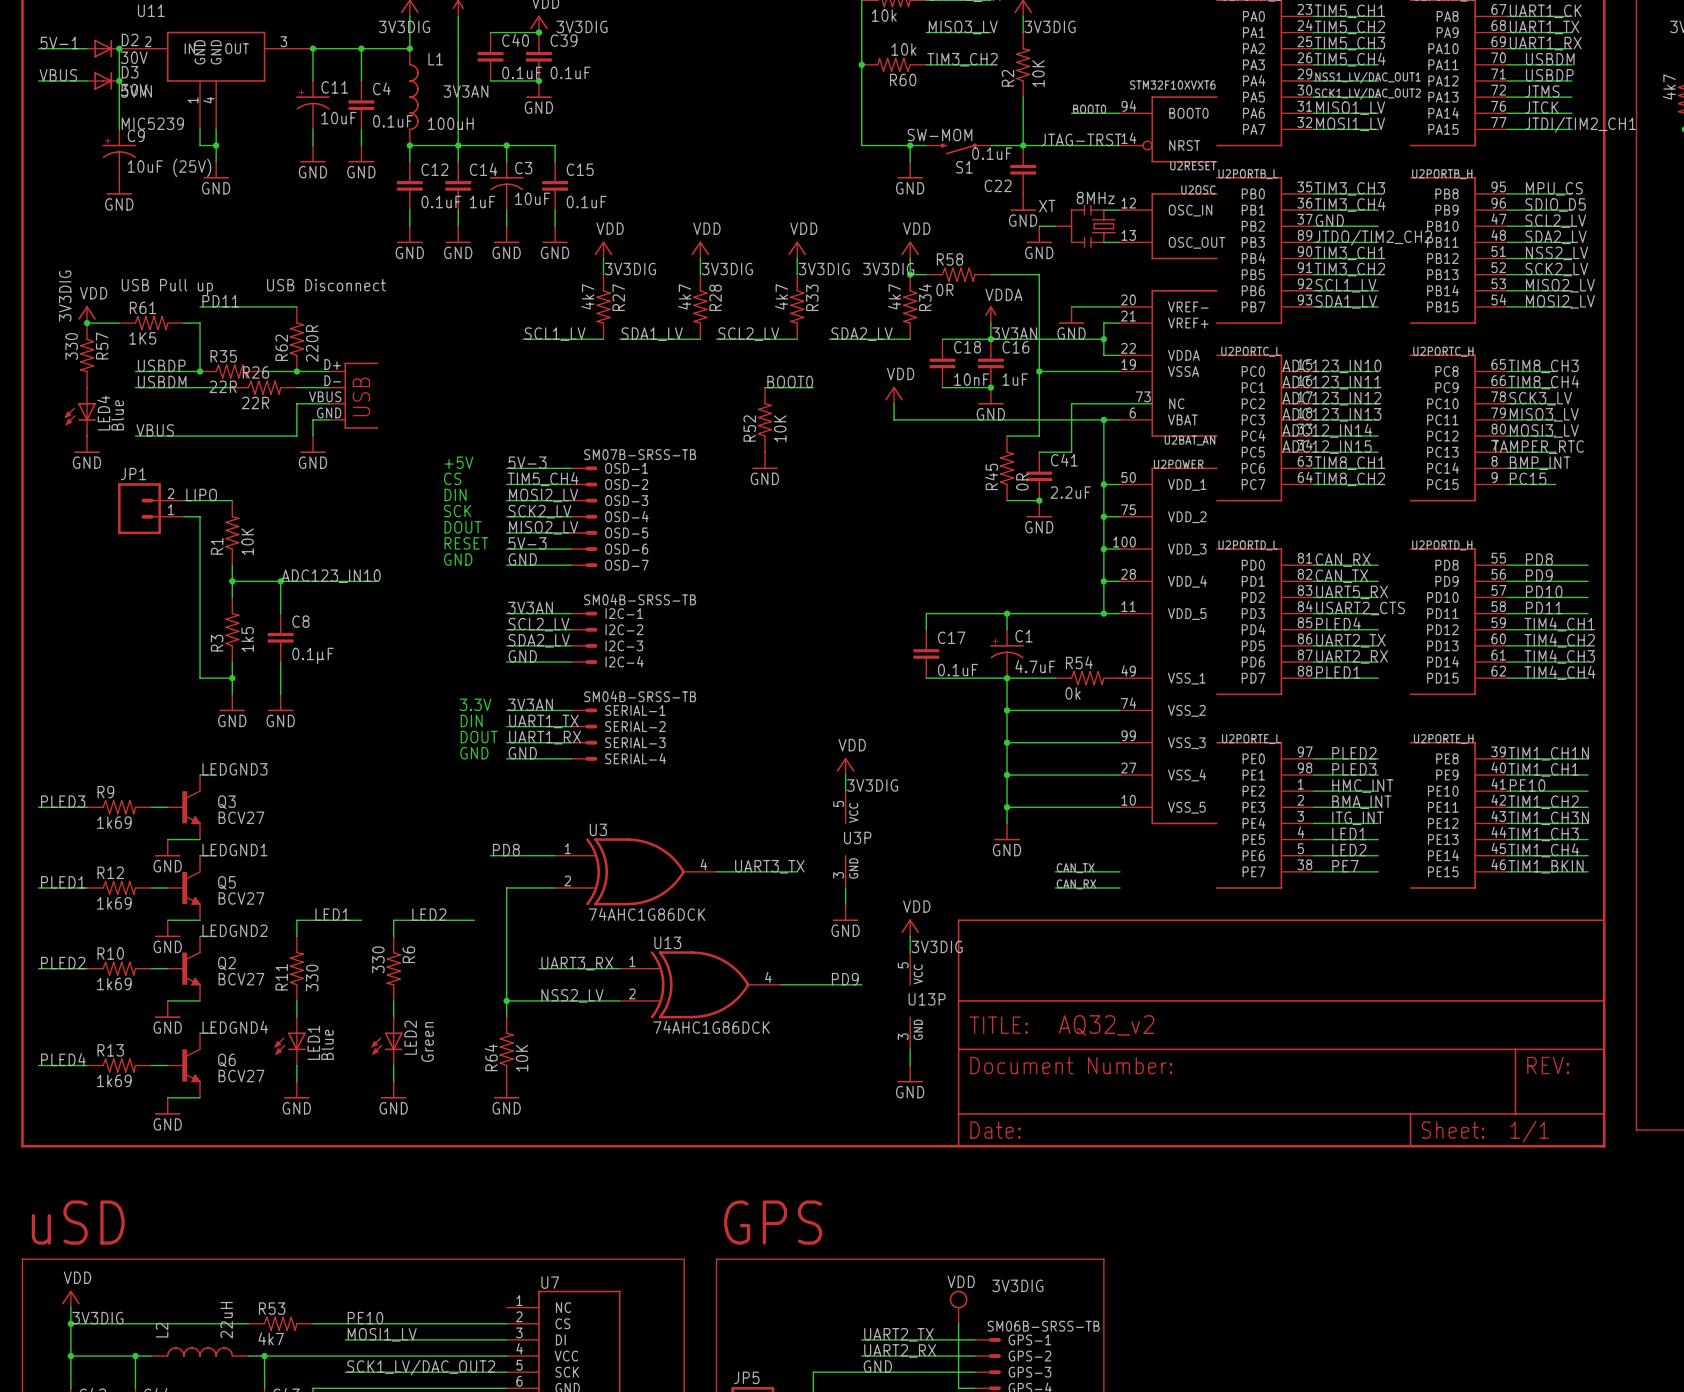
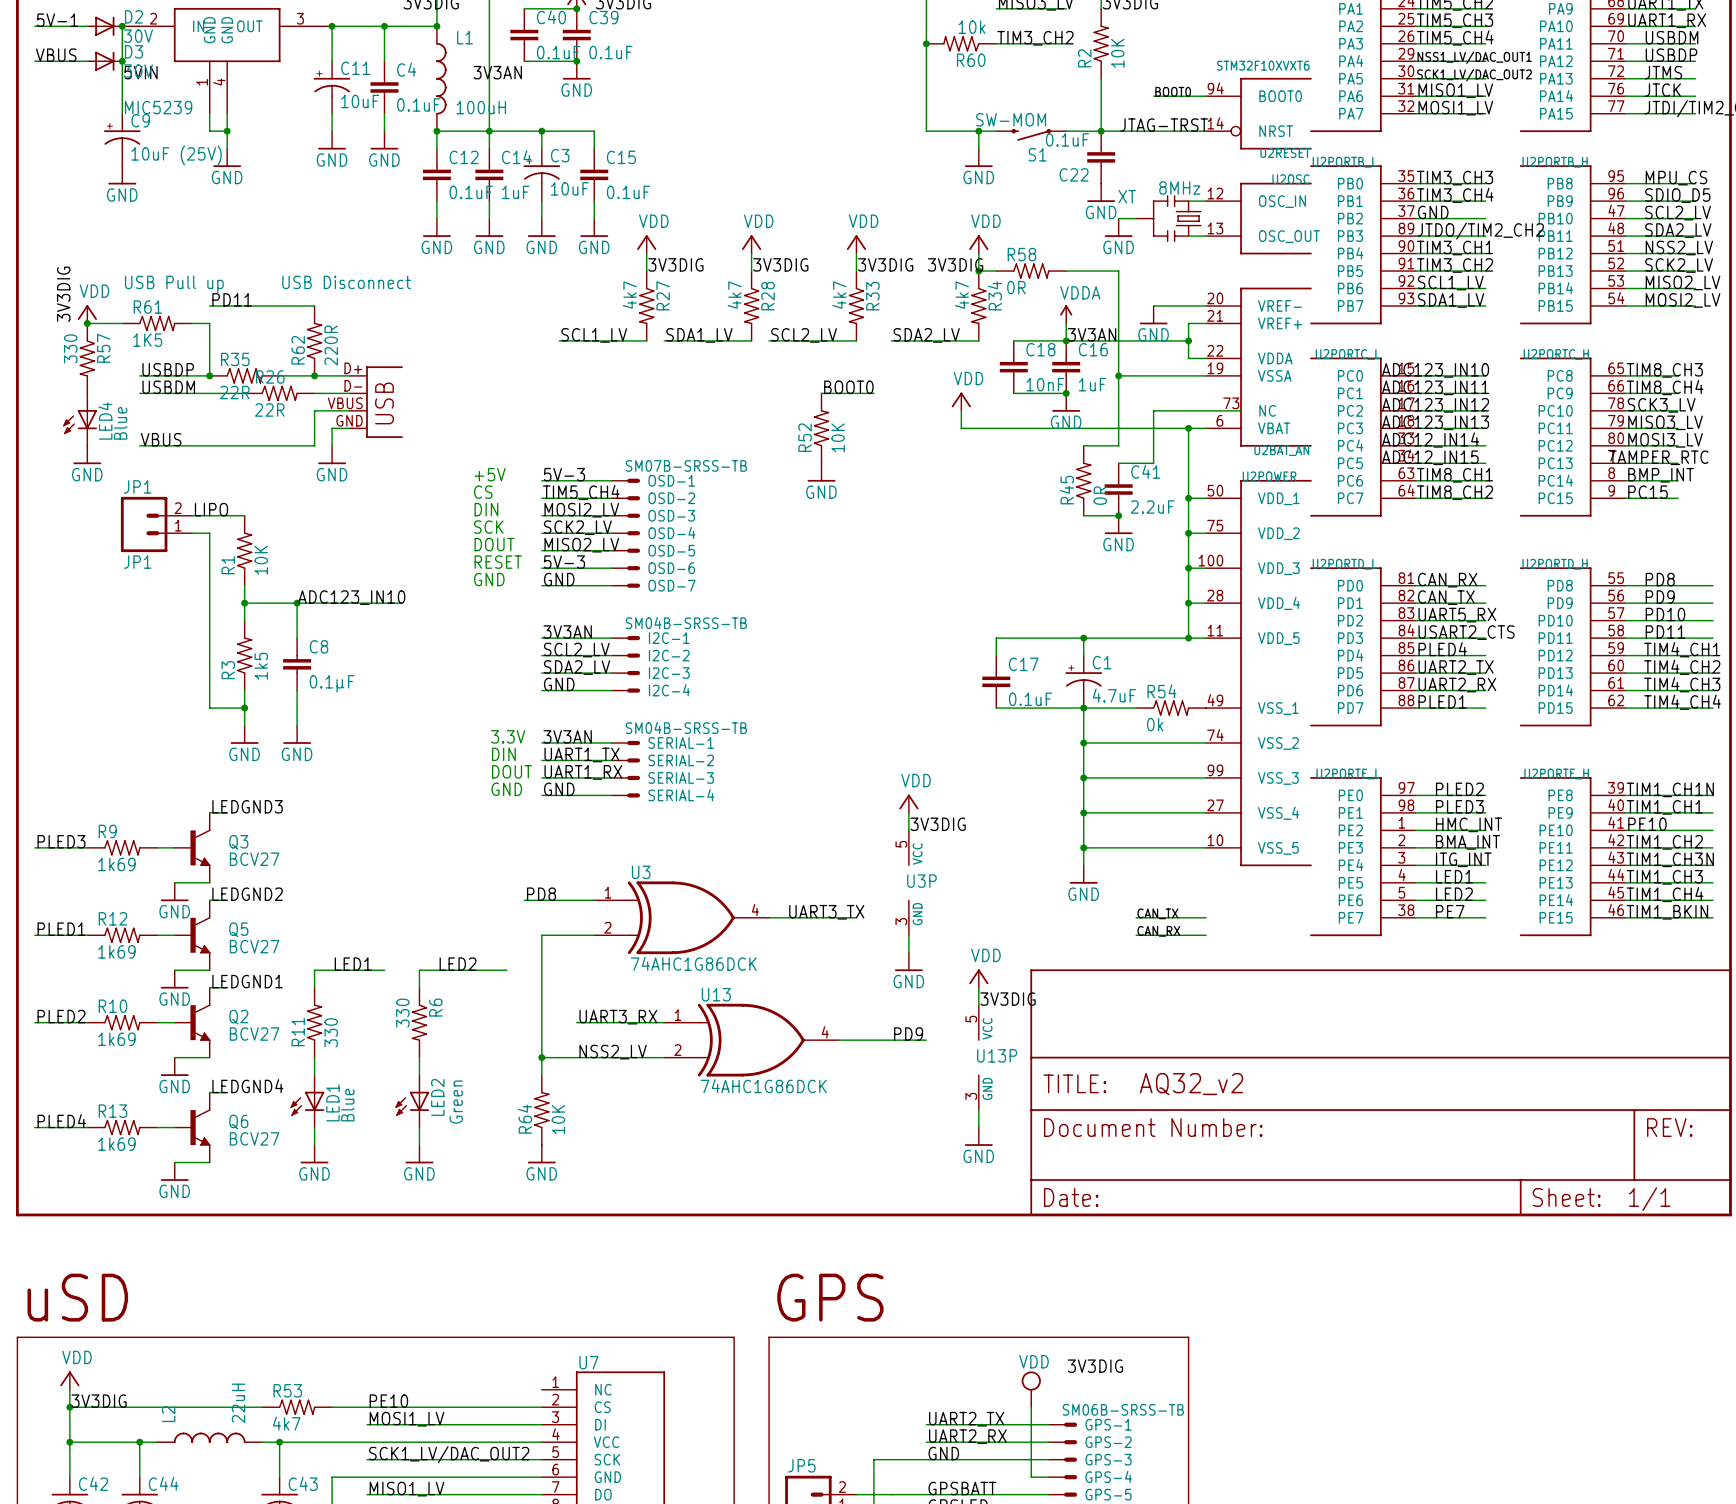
JP1 value: none -> JP1 (137, 562)
label: LEDGND1 (234, 850) -> LEDGND2 (247, 894)
label: LEDGND2 (234, 930) -> LEDGND1 (247, 981)

